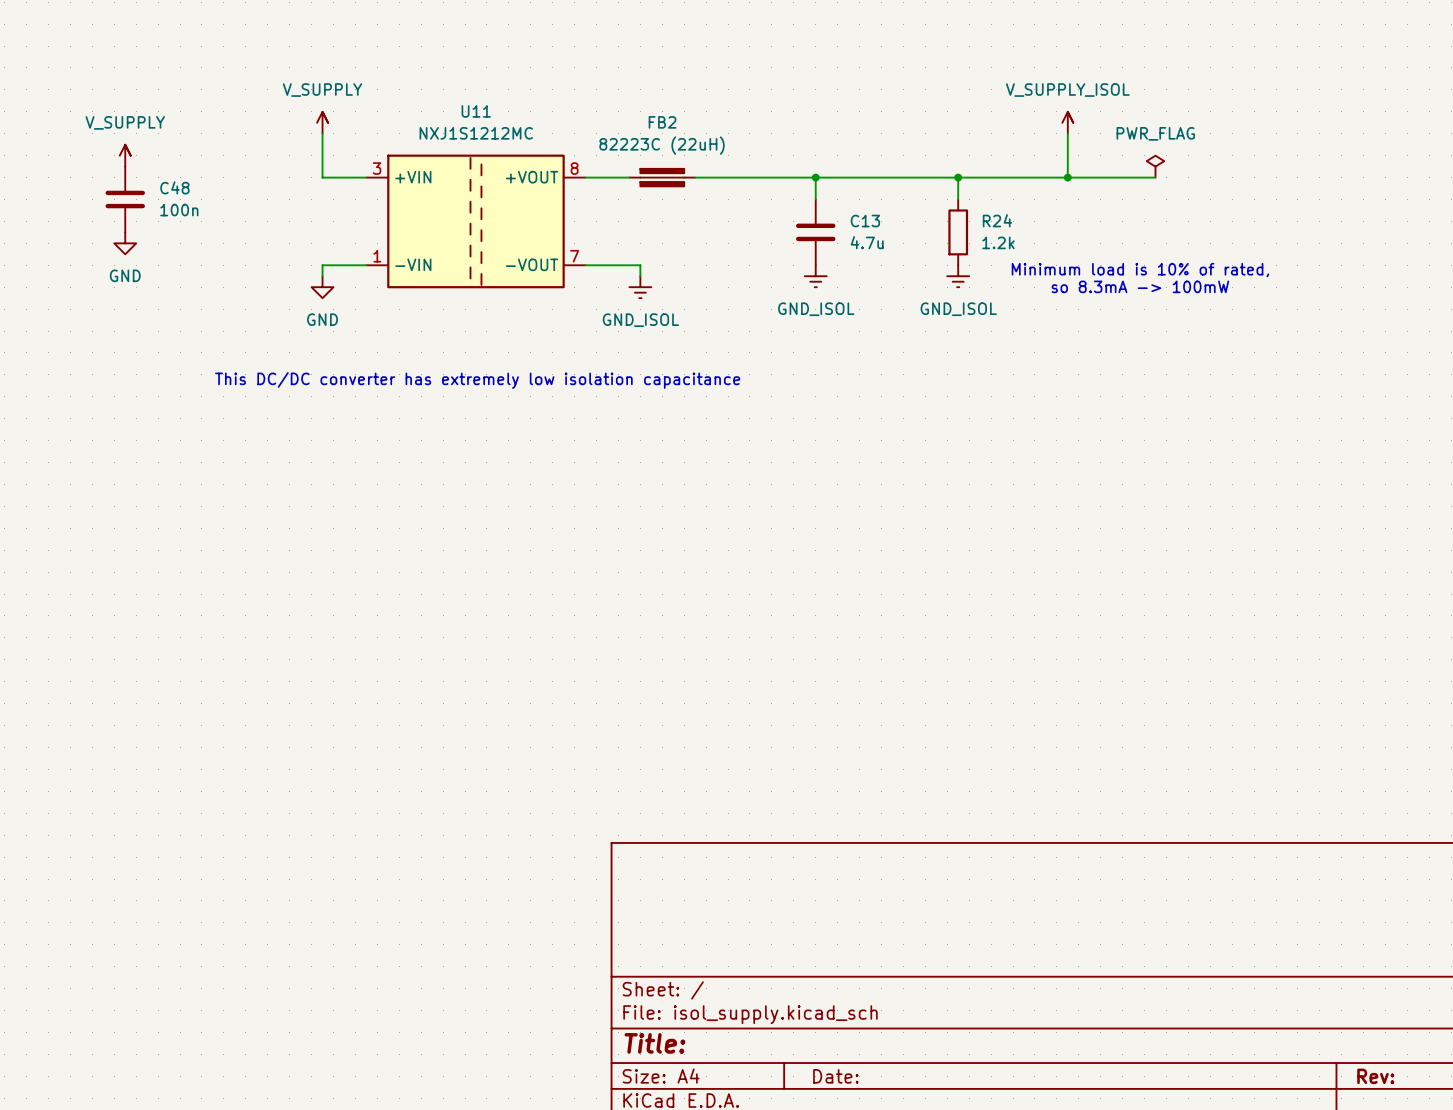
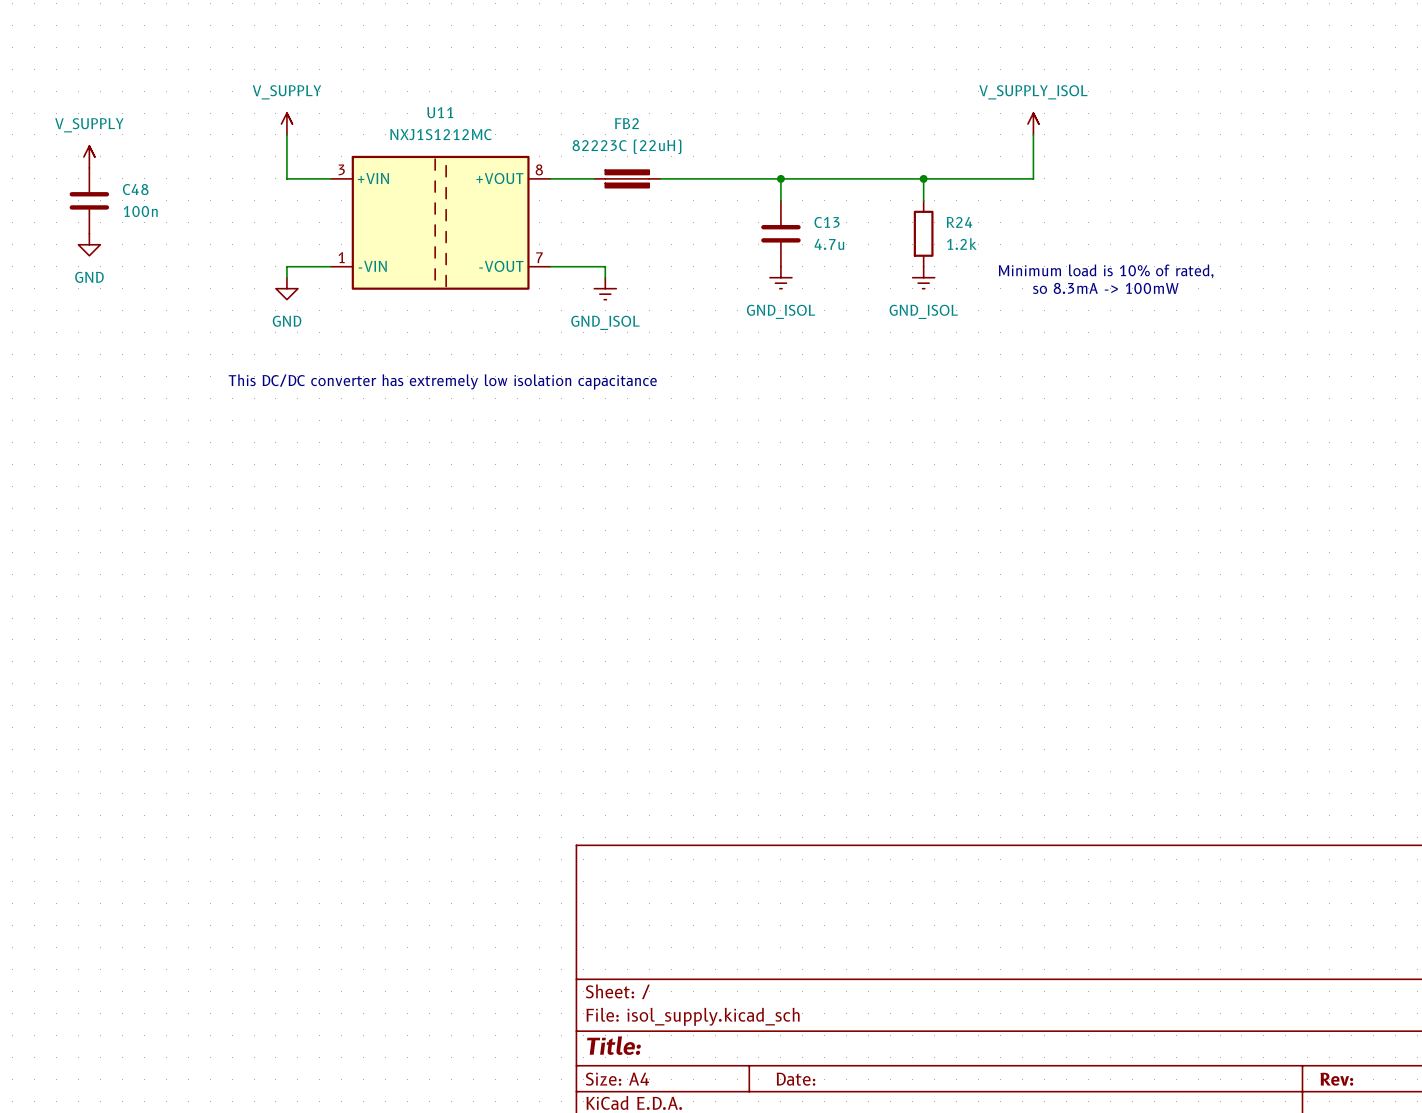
power symbol: PWR_FLAG (1155, 166) -> none
wire: (1067, 177) (1155, 177) -> none
junction: (1067, 177) -> none

